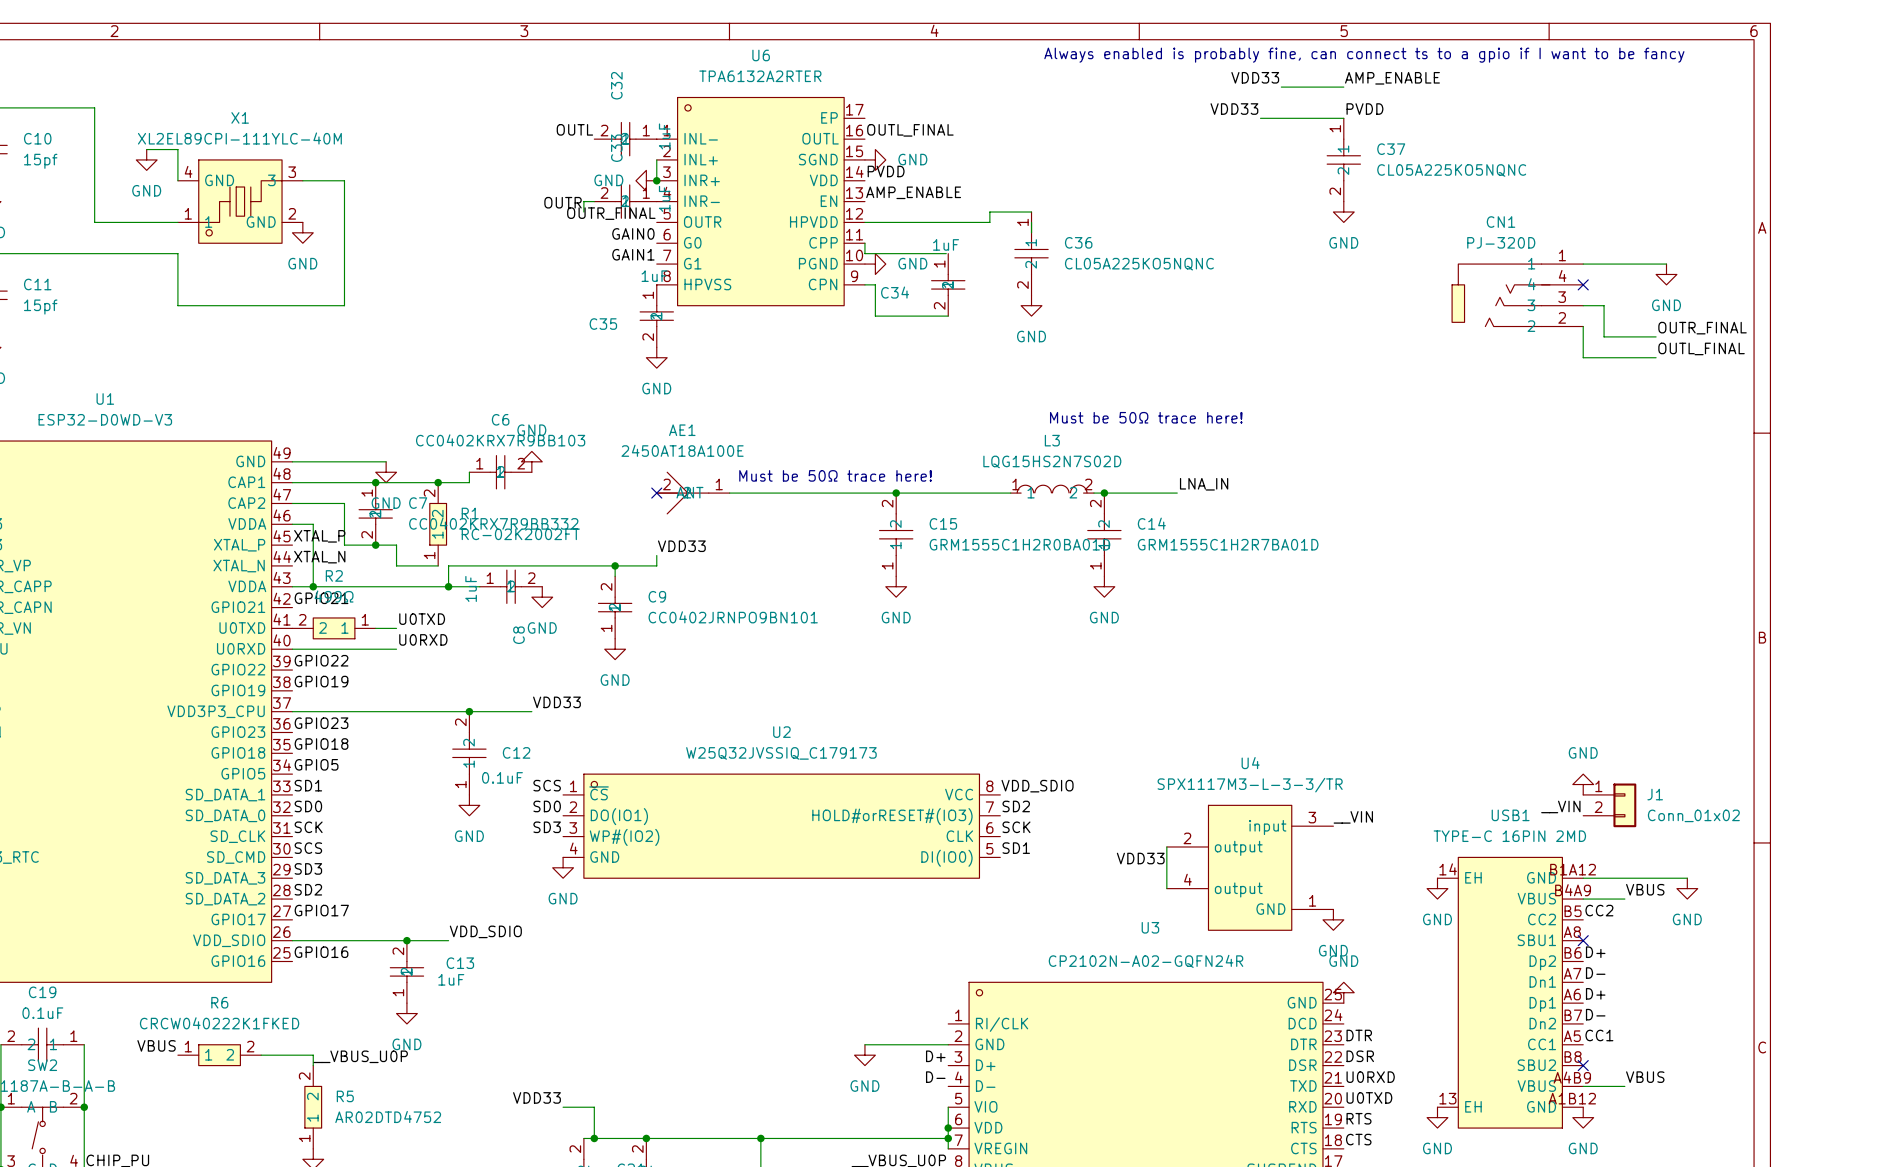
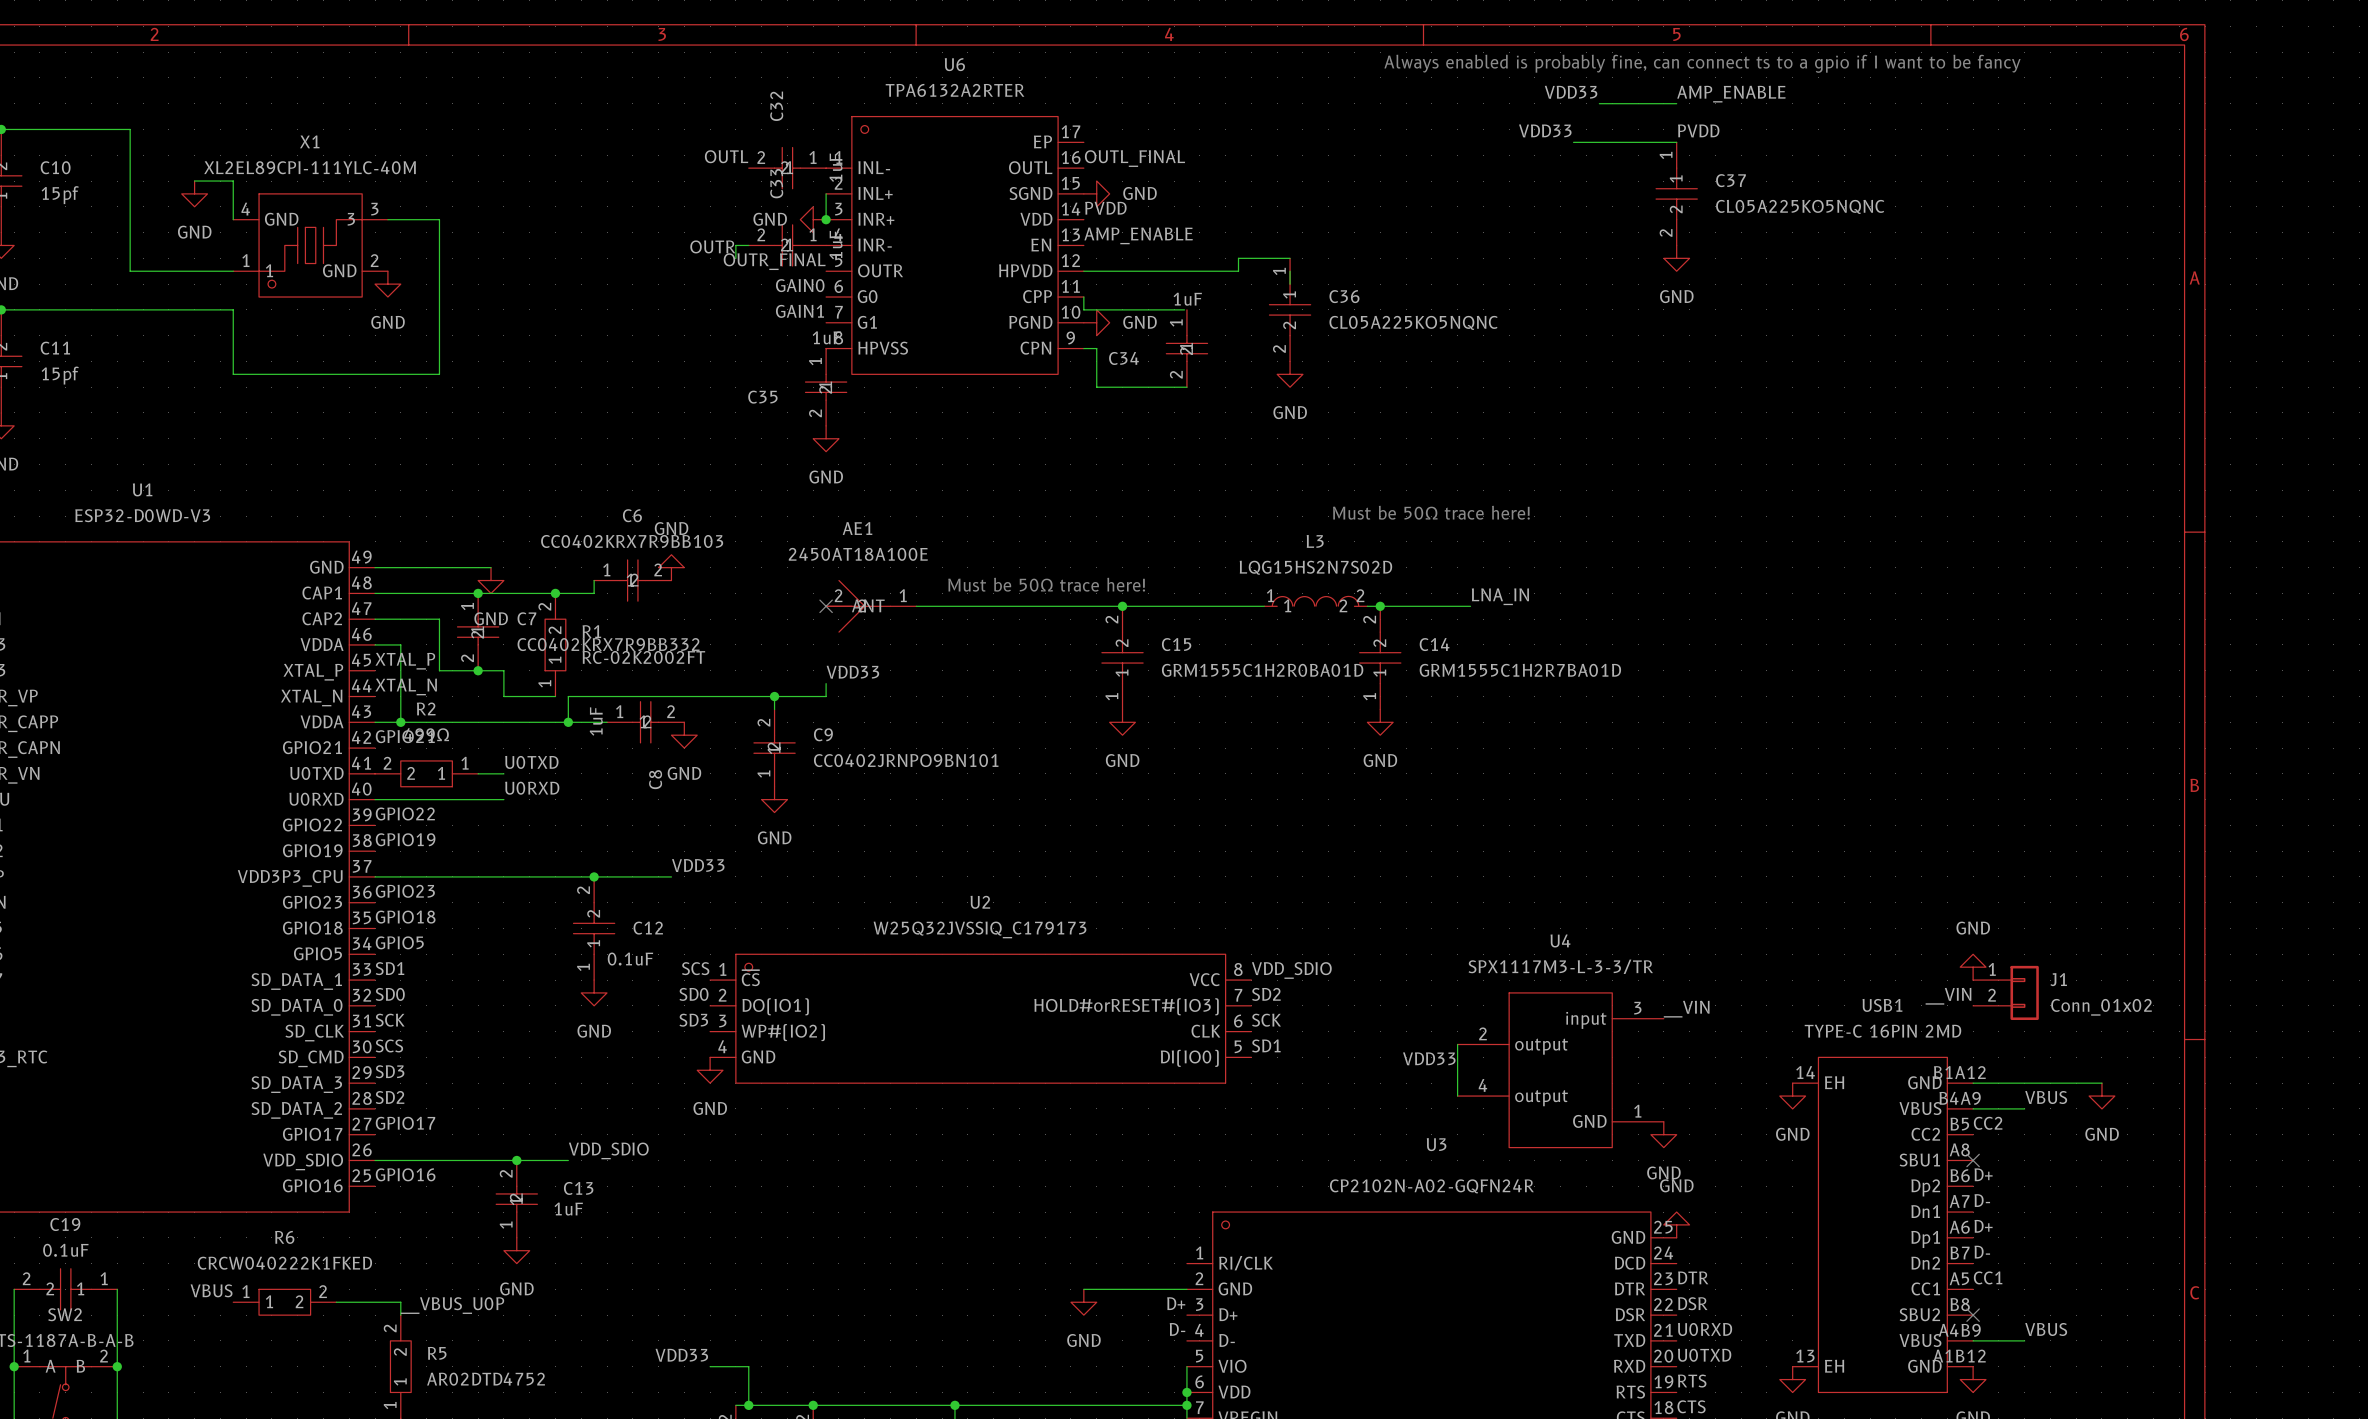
wire: (1583, 264) (1666, 264) -> none
power symbol: GND (1666, 274) -> none
no-connect mark: (1583, 284) -> none
CN1: PJ-320D (1517, 295) -> none
wire: (1583, 305) (1604, 305) (1604, 336) (1656, 336) -> none
wire: (1583, 326) (1583, 357) (1656, 357) -> none
label: OUTR_FINAL (1702, 328) -> none
label: OUTL_FINAL (1701, 348) -> none

